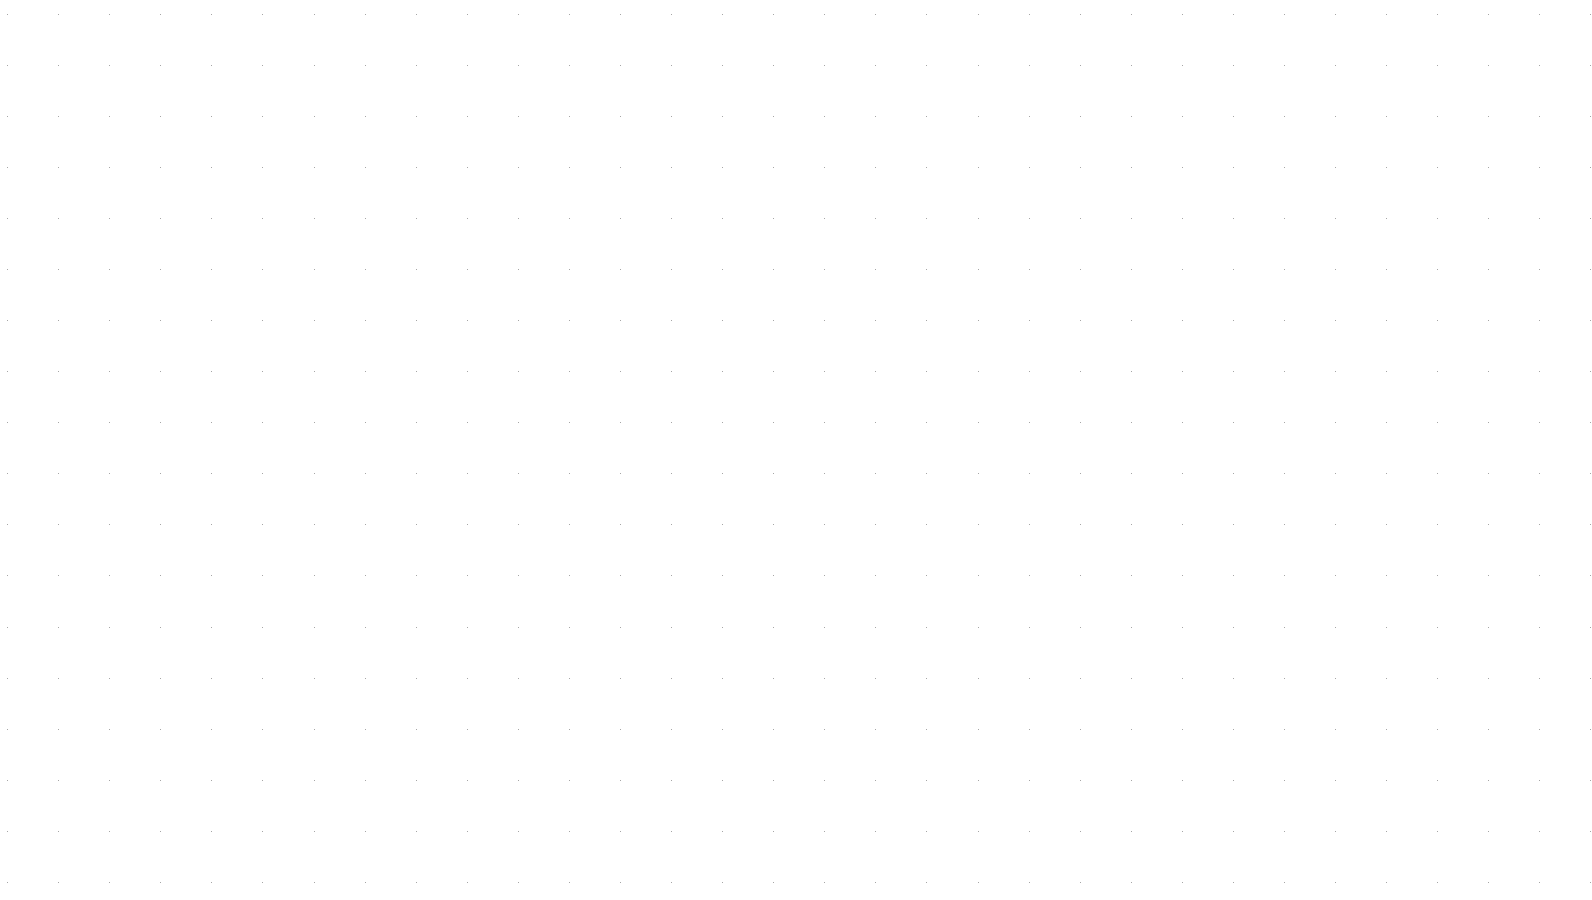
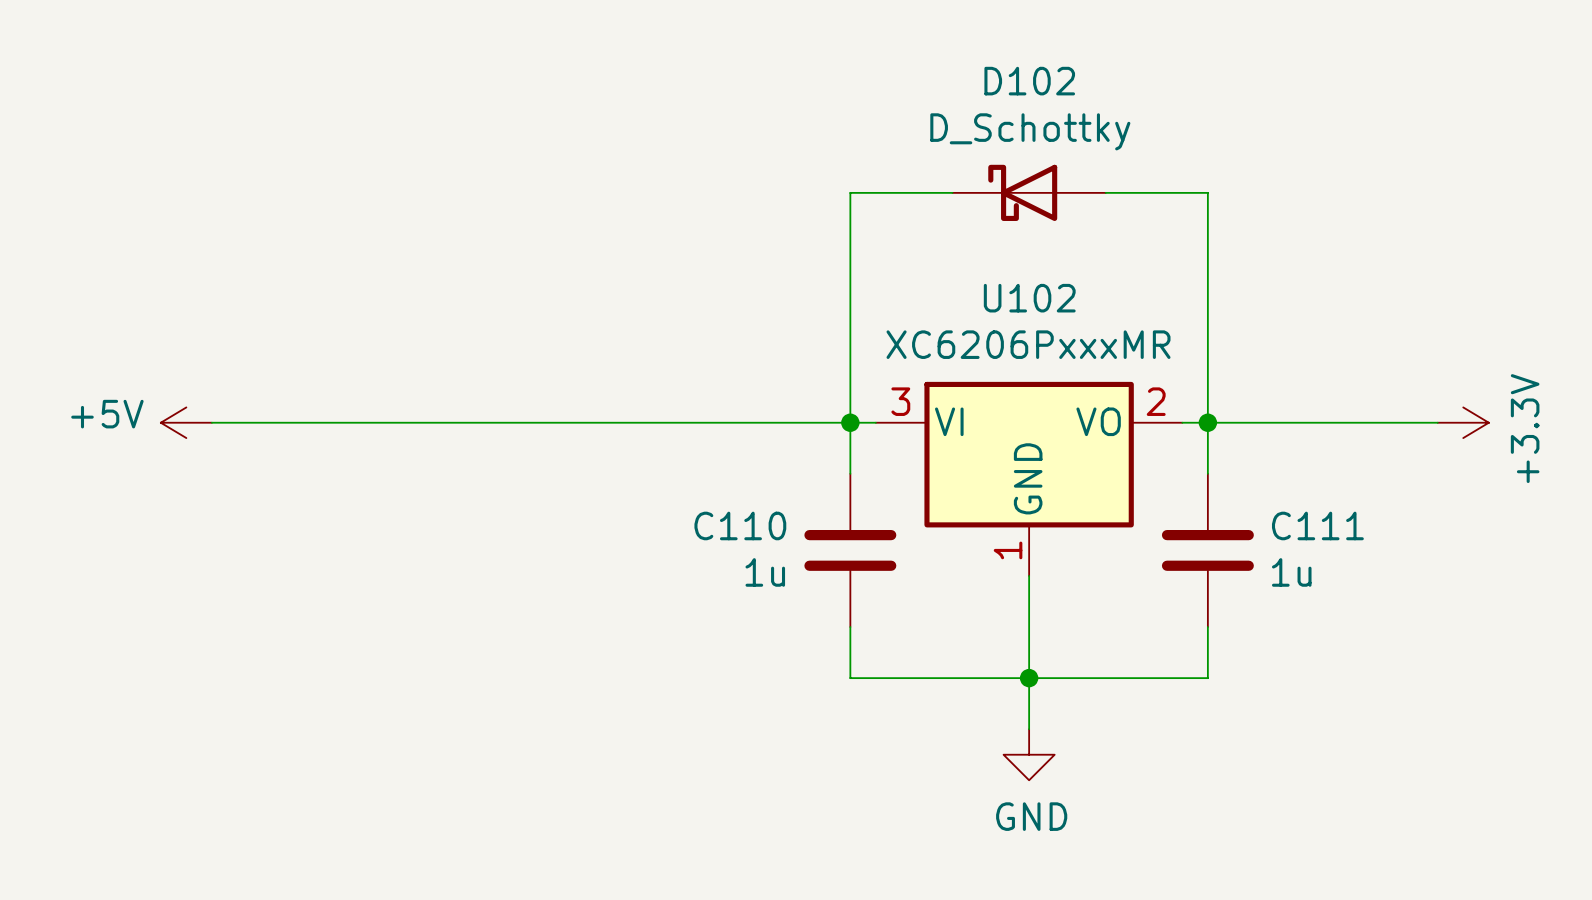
wire: none -> (952, 192) (850, 192) (850, 473)
D102: none -> D_Schottky (1029, 192)
wire: none -> (1105, 192) (1207, 192) (1207, 473)
power symbol: none -> +5V (186, 422)
wire: none -> (211, 422) (875, 422)
junction: none -> (850, 422)
wire: none -> (1182, 422) (1437, 422)
junction: none -> (1207, 422)
power symbol: none -> +3.3V (1463, 422)
U102: none -> XC6206PxxxMR (1029, 478)
C110: none -> 1u (850, 550)
C111: none -> 1u (1207, 550)
wire: none -> (1029, 575) (1029, 729)
wire: none -> (850, 627) (850, 678) (1207, 678) (1207, 627)
junction: none -> (1029, 678)
power symbol: none -> GND (1029, 754)

